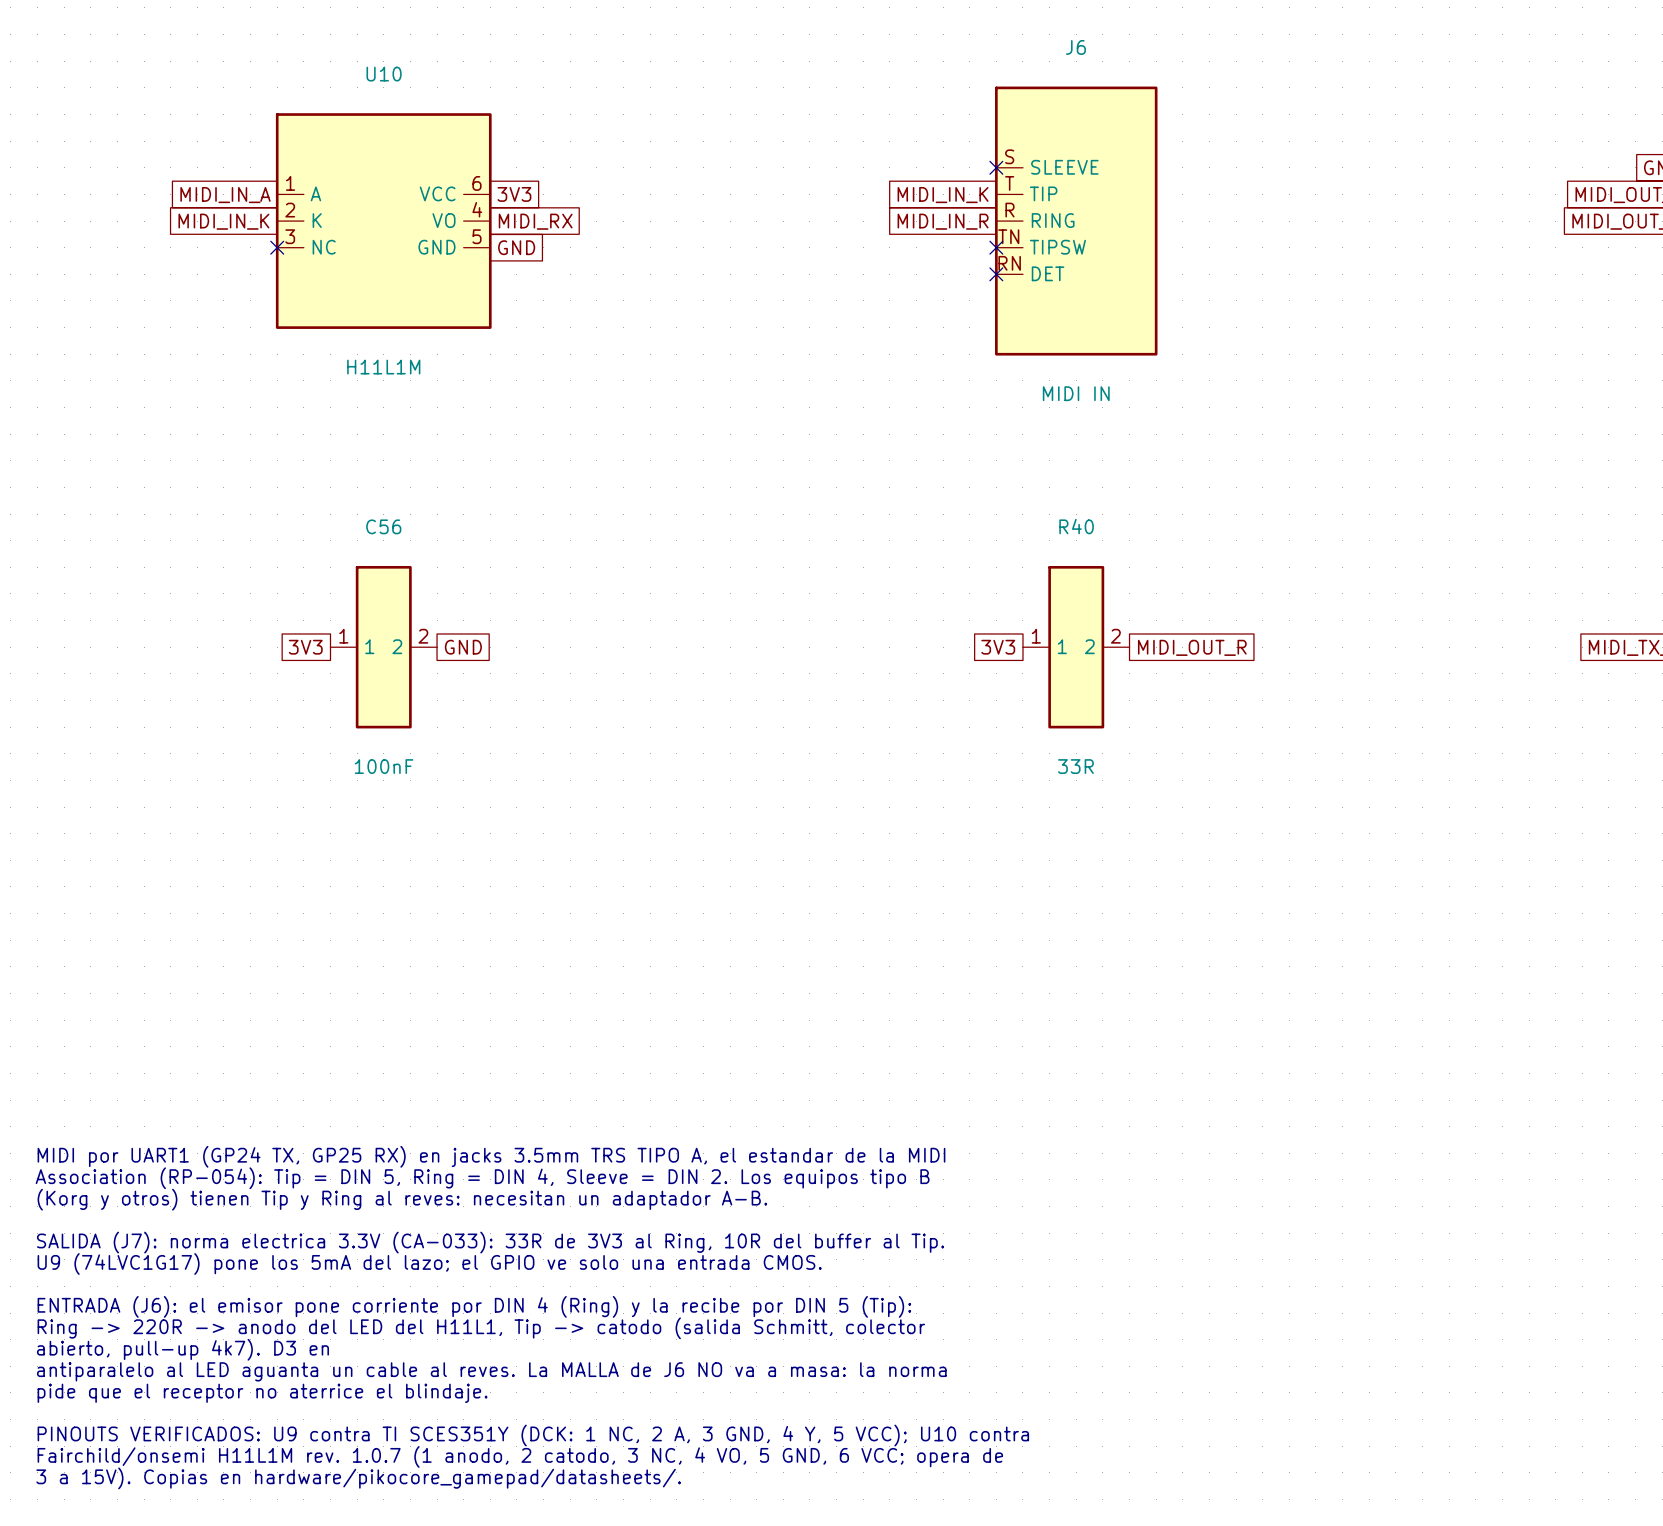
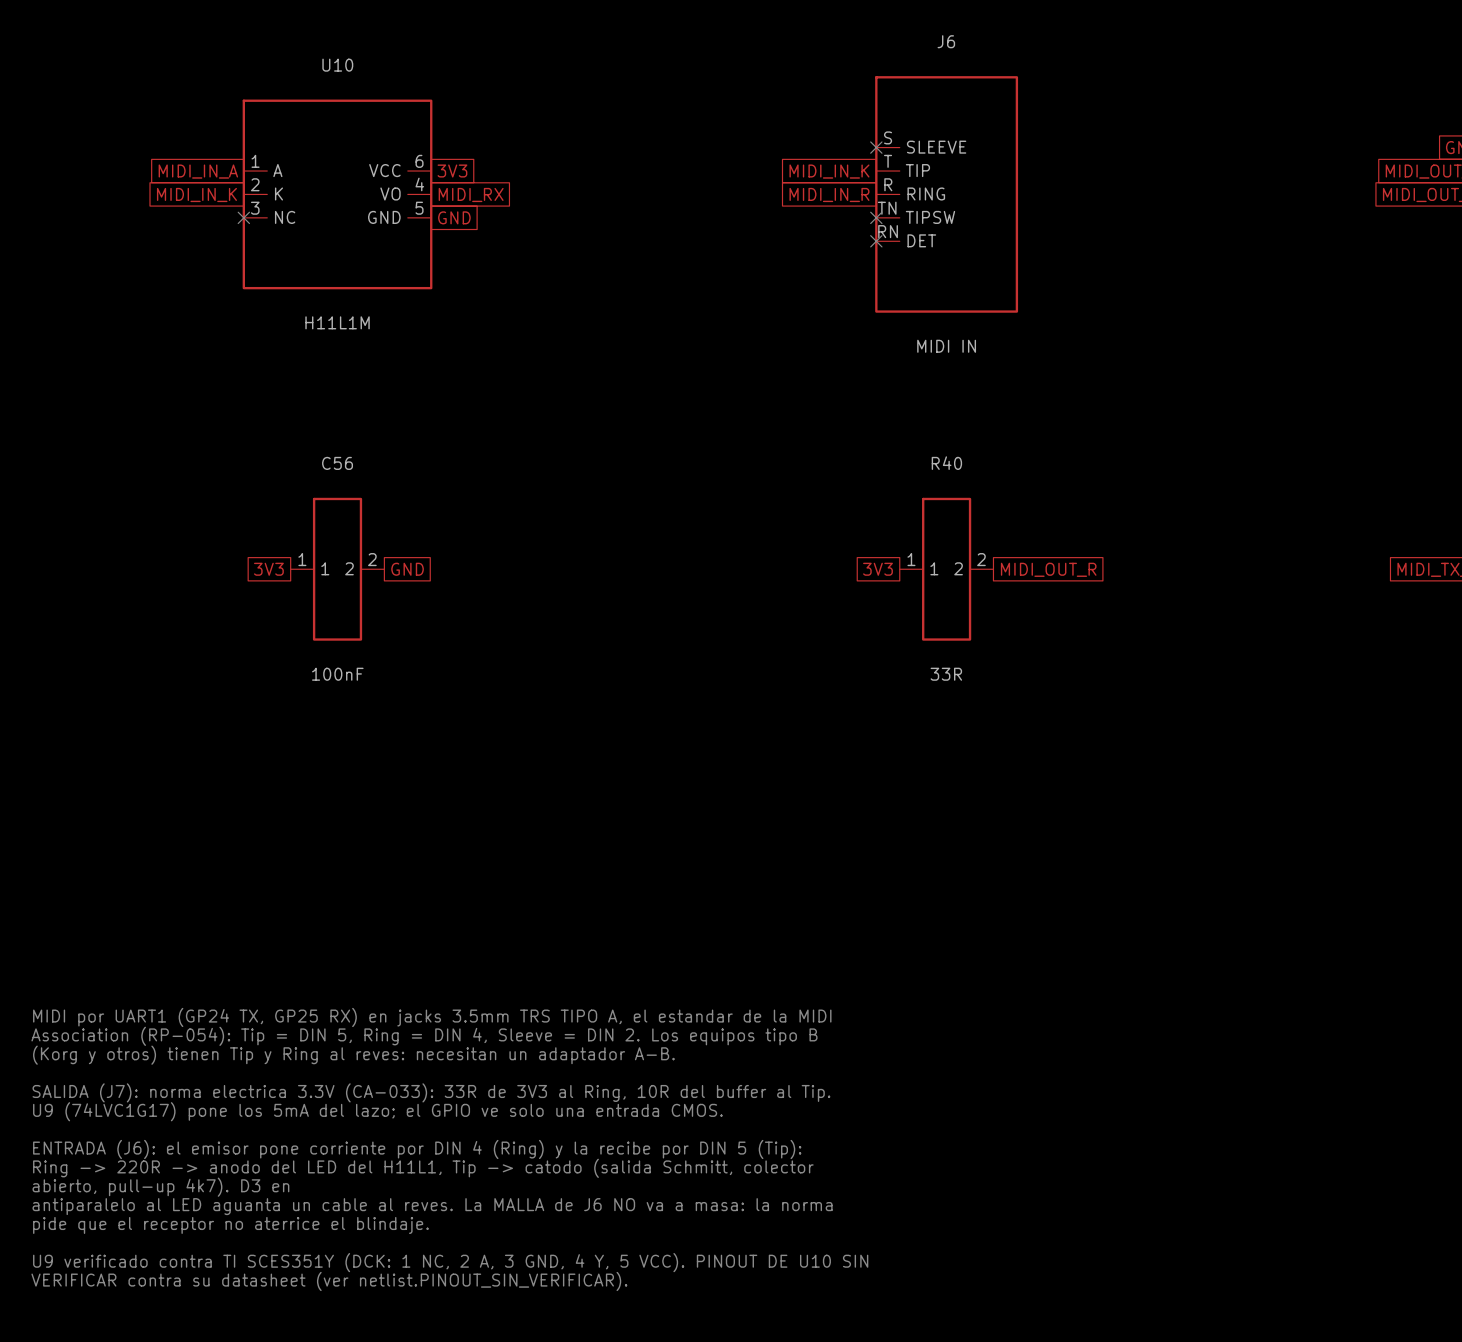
text: PINOUTS VERIFICADOS: U9 contra TI SCES351Y (DCK: 1 NC, 2 A, 3 GND, 4 Y, 5 VCC); U10 contra (533, 1435) -> U9 verificado contra TI SCES351Y (DCK: 1 NC, 2 A, 3 GND, 4 Y, 5 VCC). PINOUT DE U10 SIN (450, 1262)
text: Fairchild/onsemi H11L1M rev. 1.0.7 (1 anodo, 2 catodo, 3 NC, 4 VO, 5 GND, 6 VCC; opera de (520, 1456) -> VERIFICAR contra su datasheet (ver netlist.PINOUT_SIN_VERIFICAR). (329, 1281)
text: 3 a 15V). Copias en hardware/pikocore_gamepad/datasheets/. (358, 1478) -> none

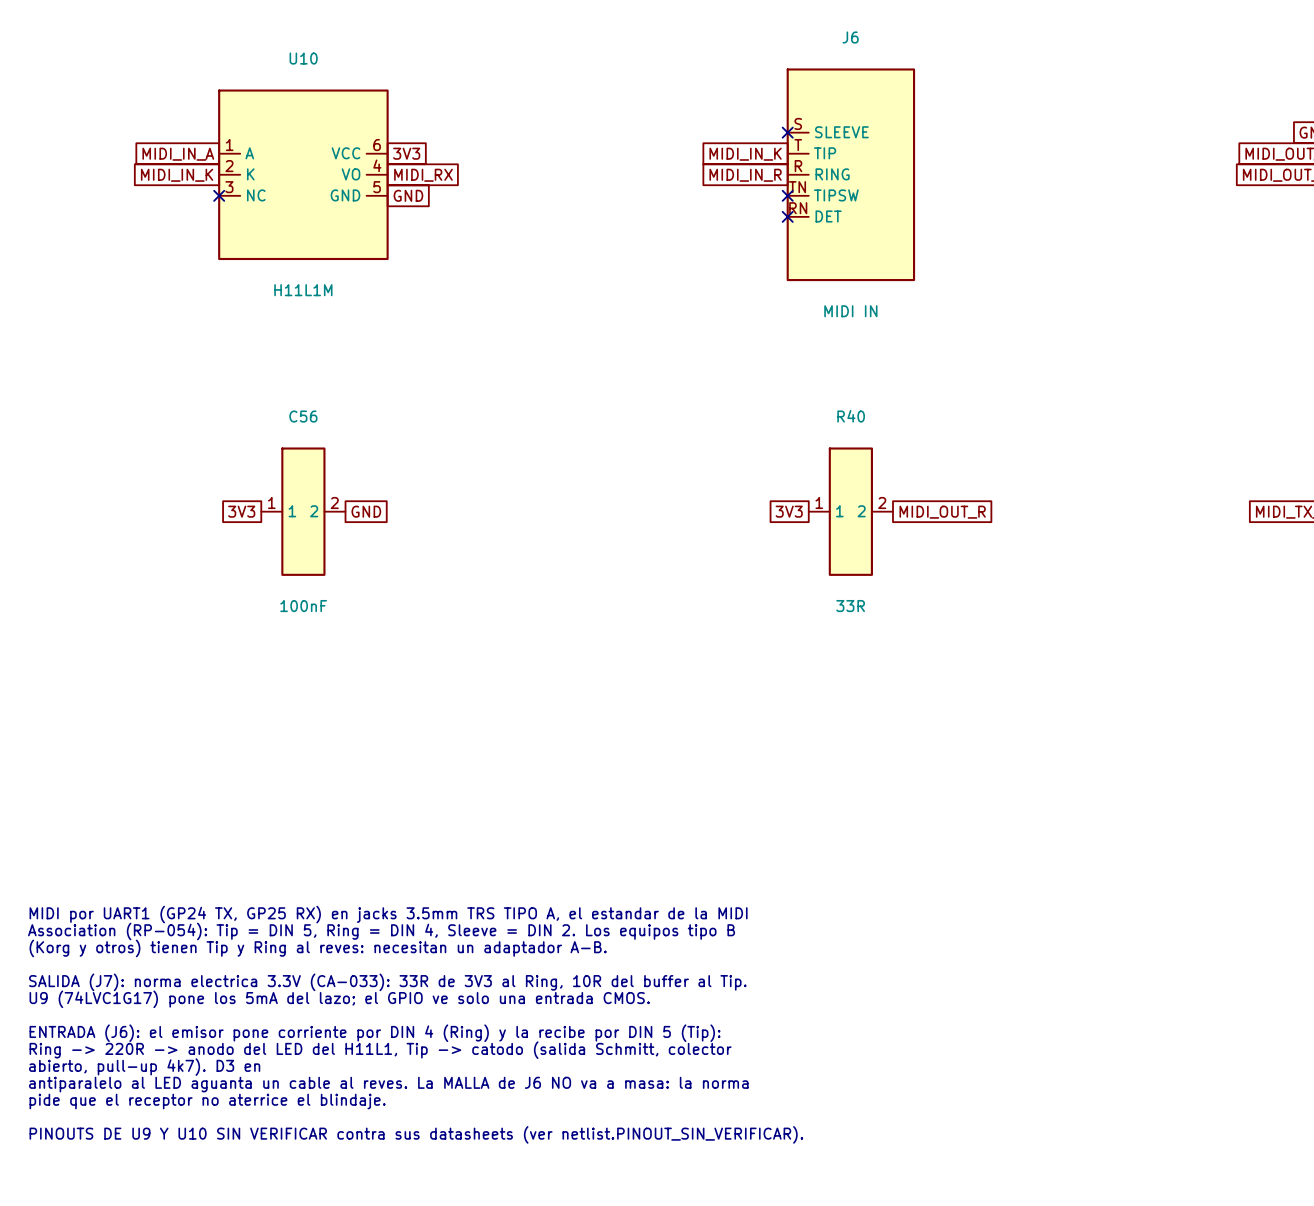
text: U9 verificado contra TI SCES351Y (DCK: 1 NC, 2 A, 3 GND, 4 Y, 5 VCC). PINOUT DE U10 SIN (450, 1262) -> PINOUTS DE U9 Y U10 SIN VERIFICAR contra sus datasheets (ver netlist.PINOUT_SIN_VERIFICAR). (416, 1134)
text: VERIFICAR contra su datasheet (ver netlist.PINOUT_SIN_VERIFICAR). (329, 1281) -> none

